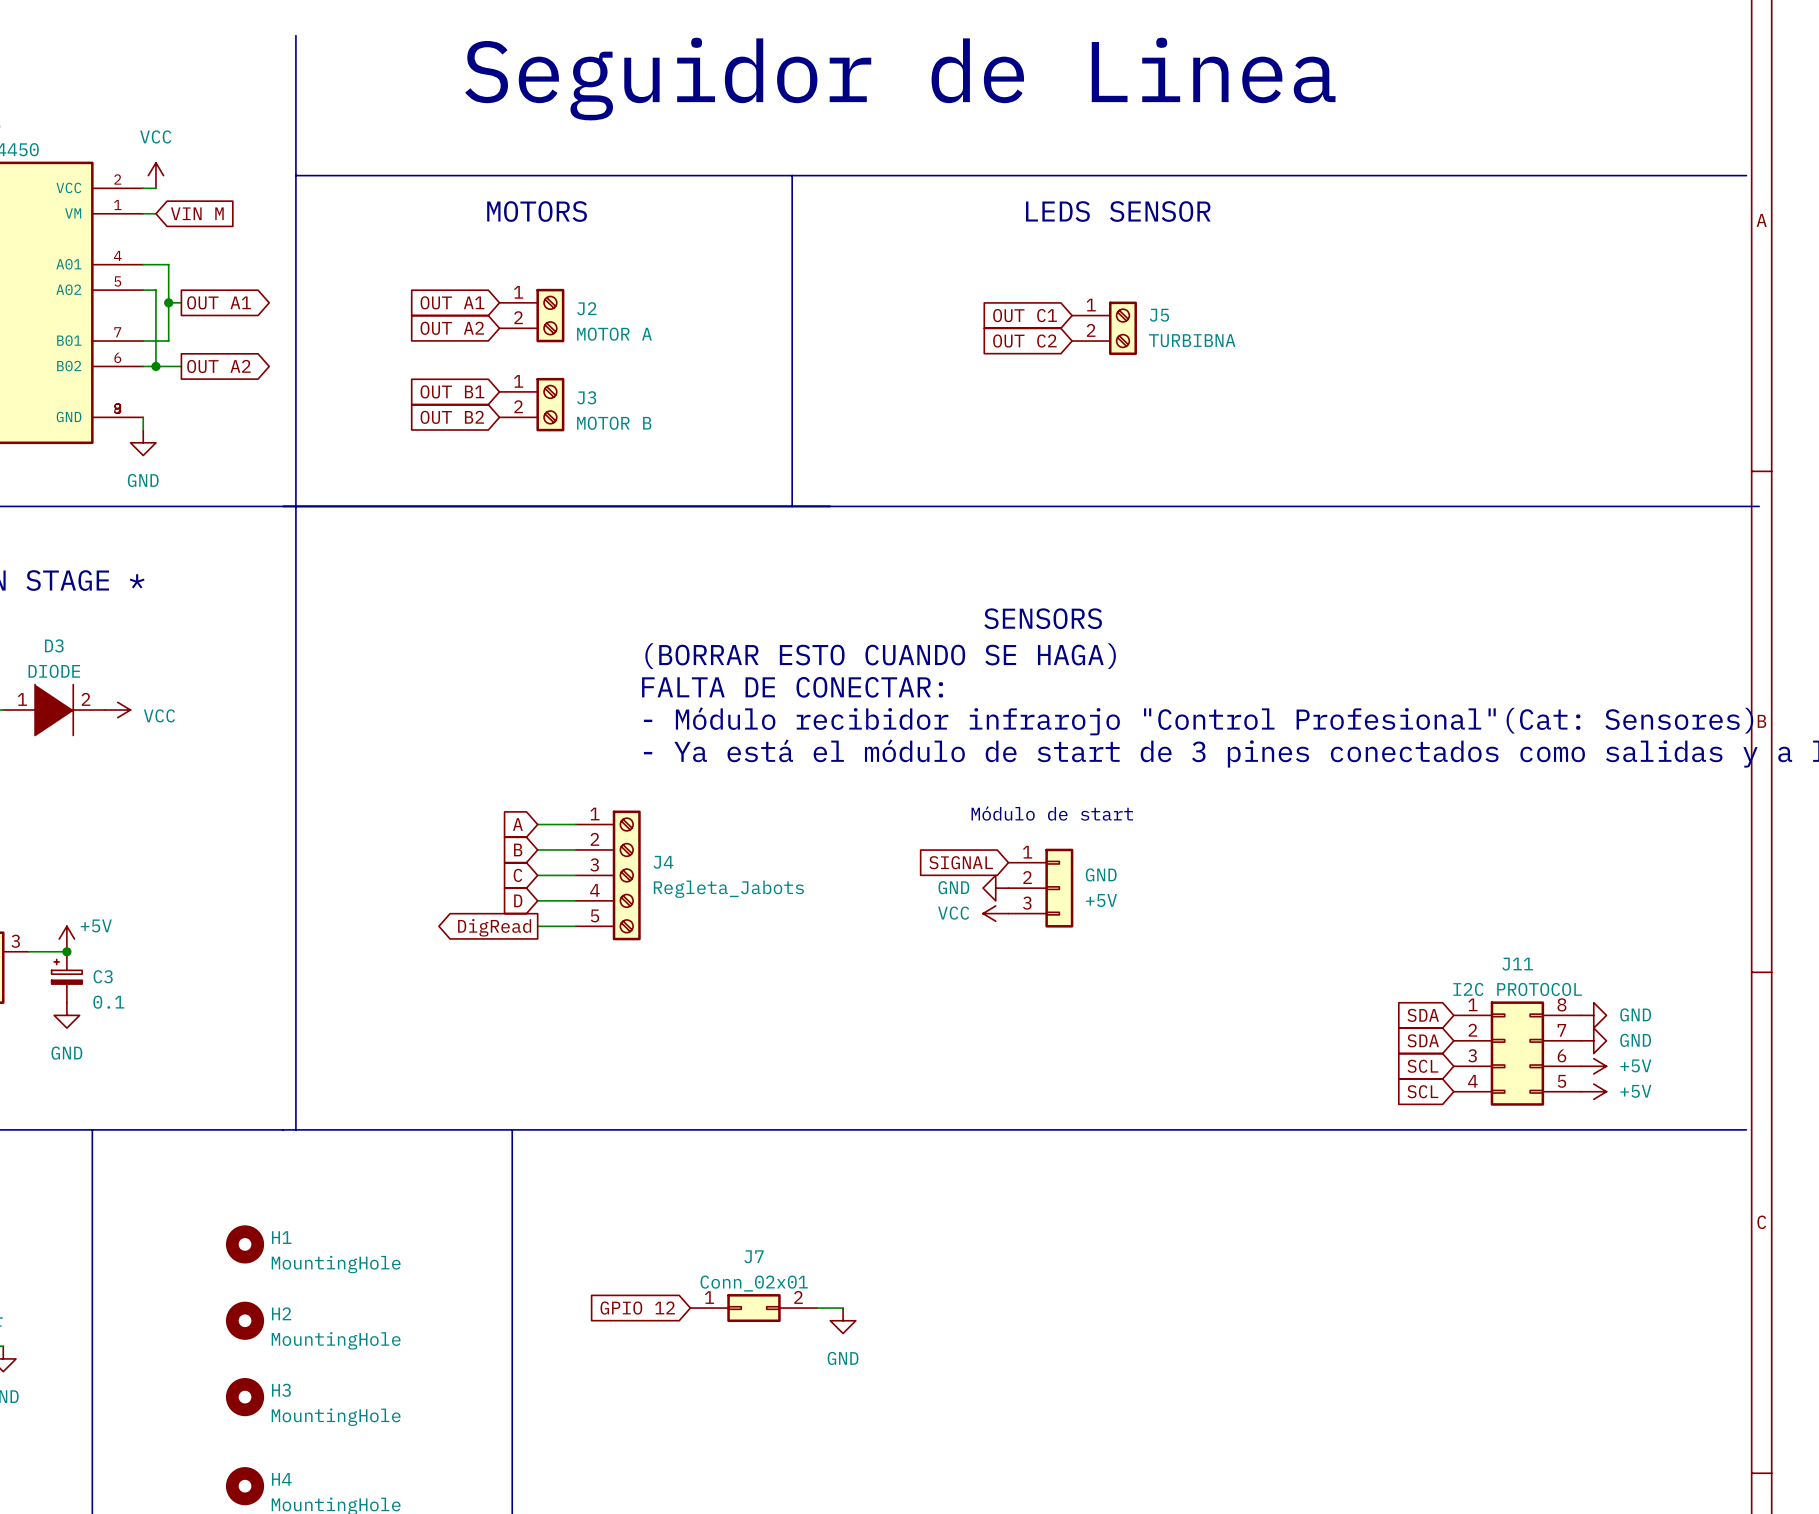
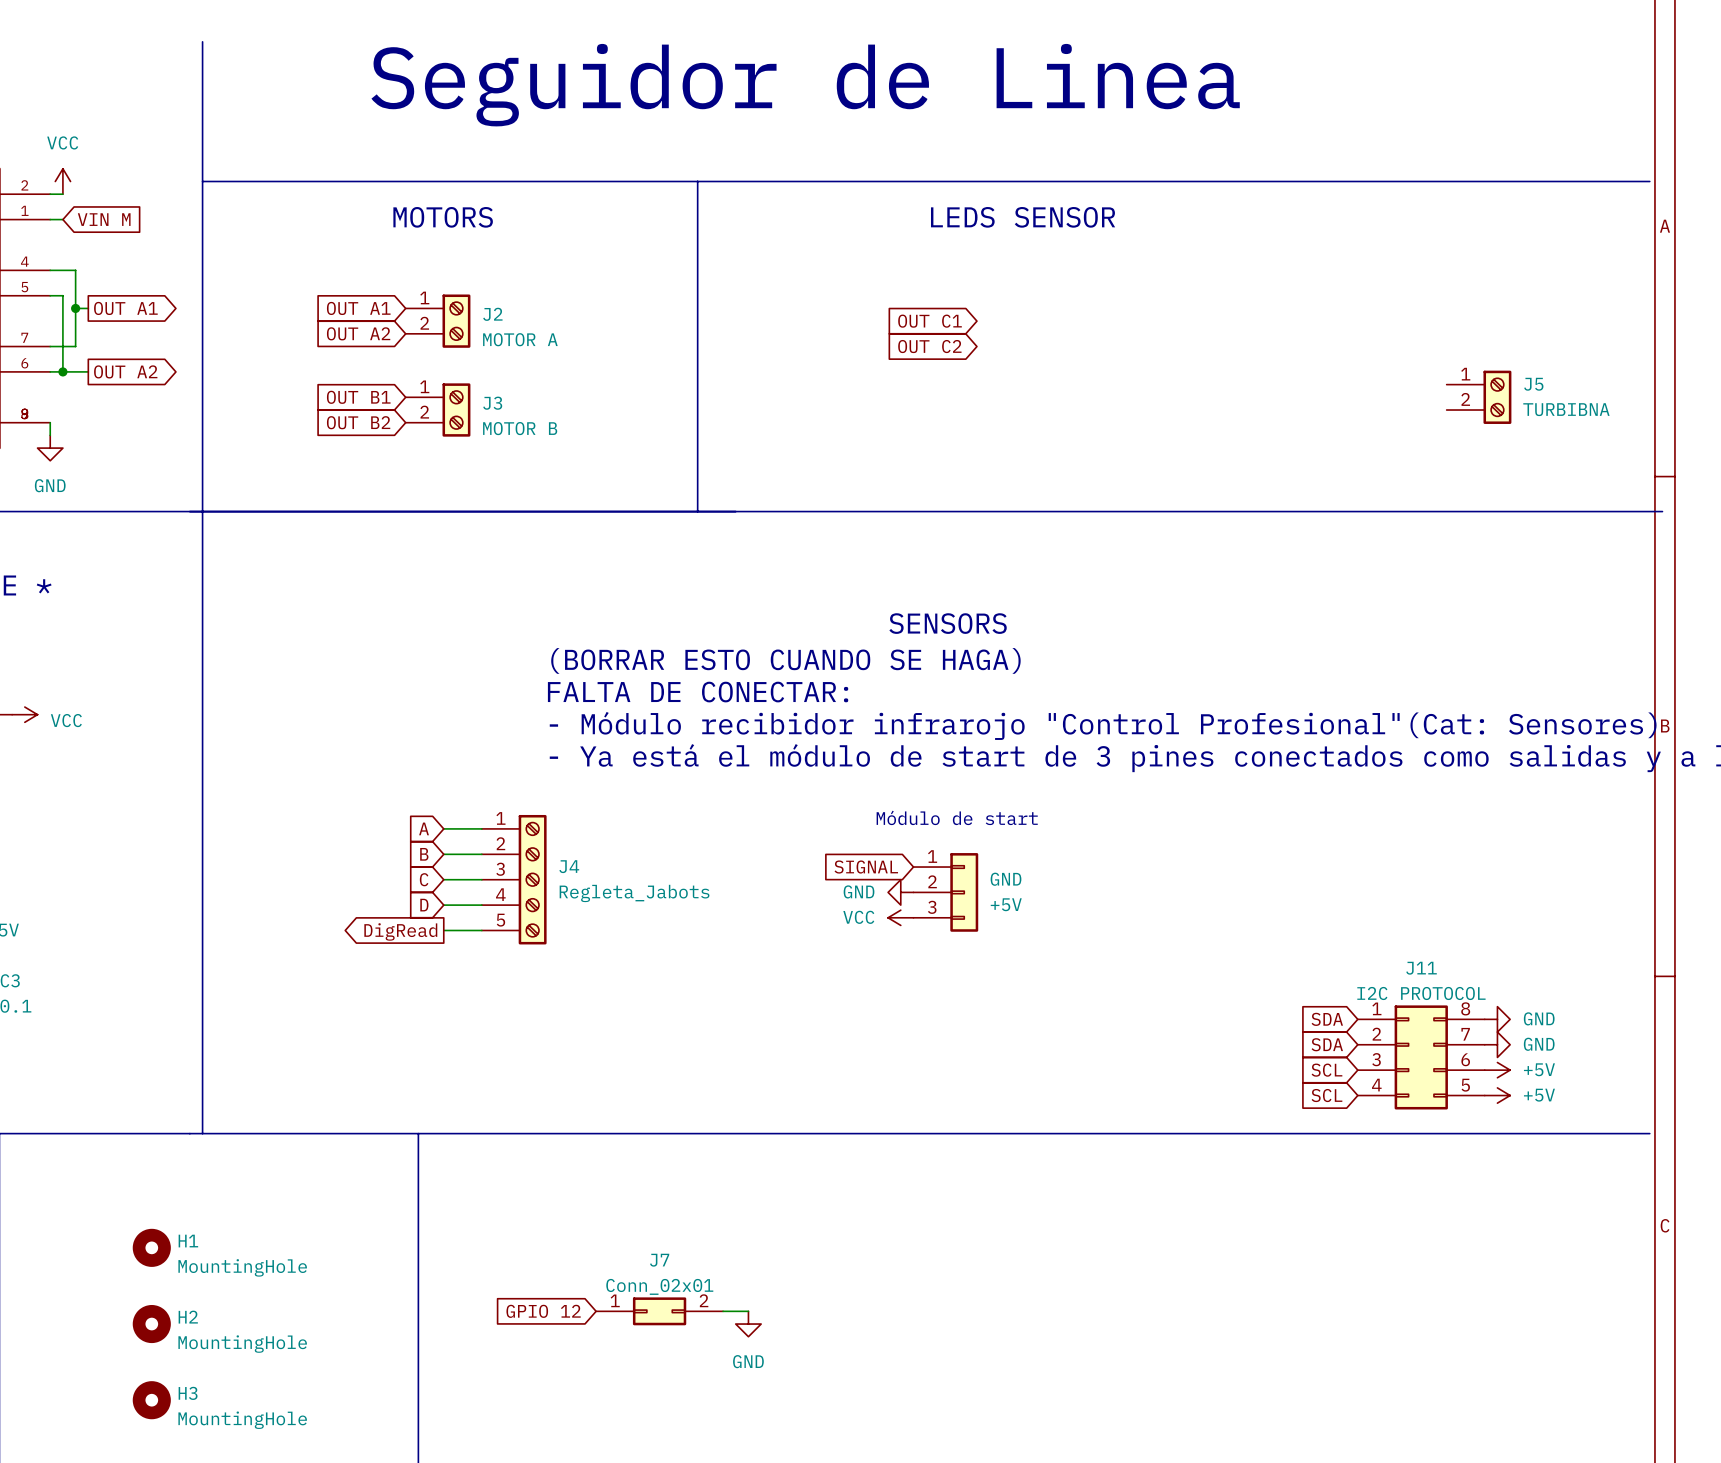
J5 position: (1104, 328) -> (1479, 397)

